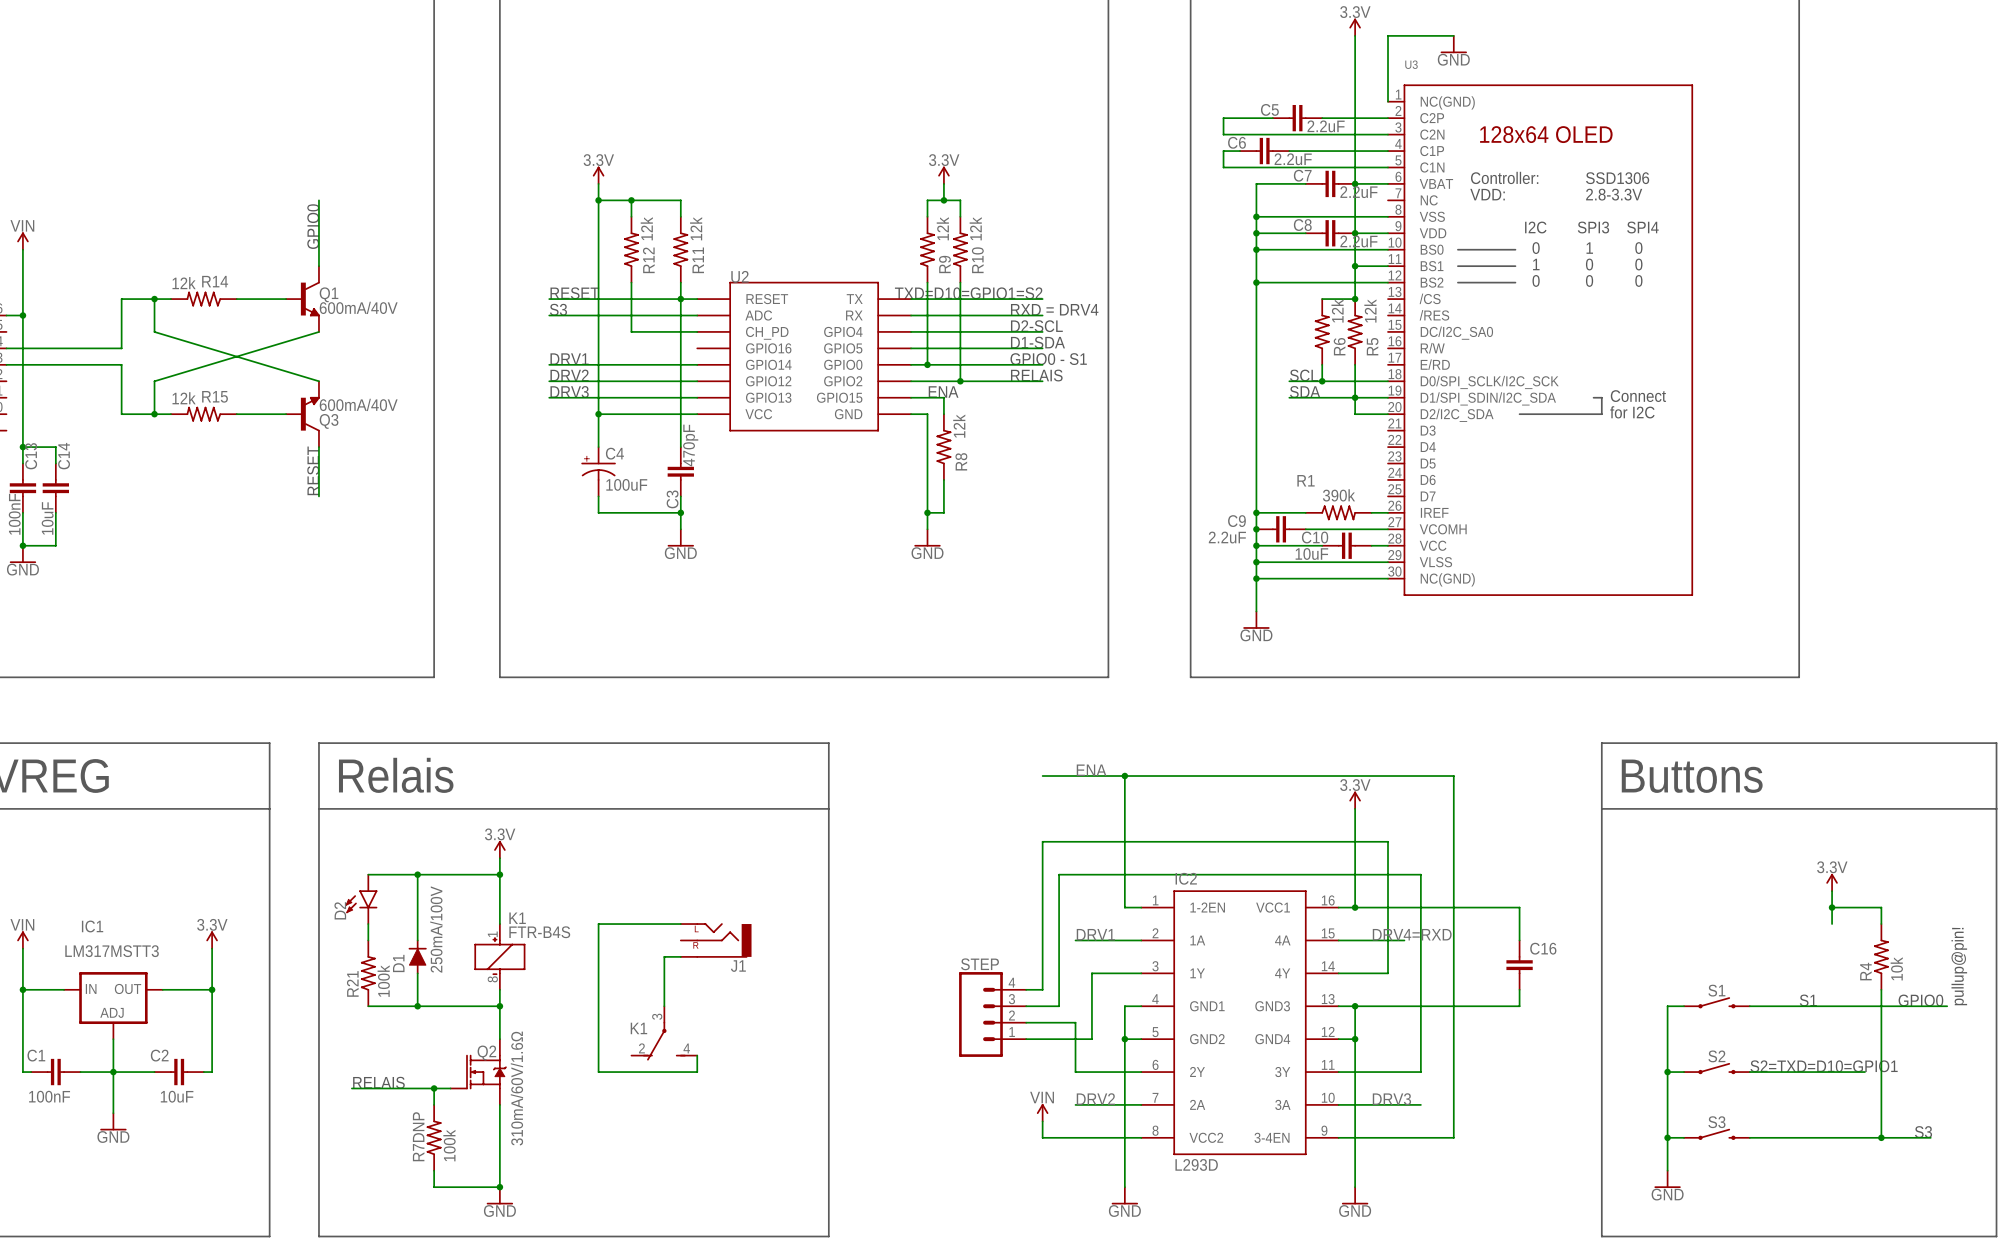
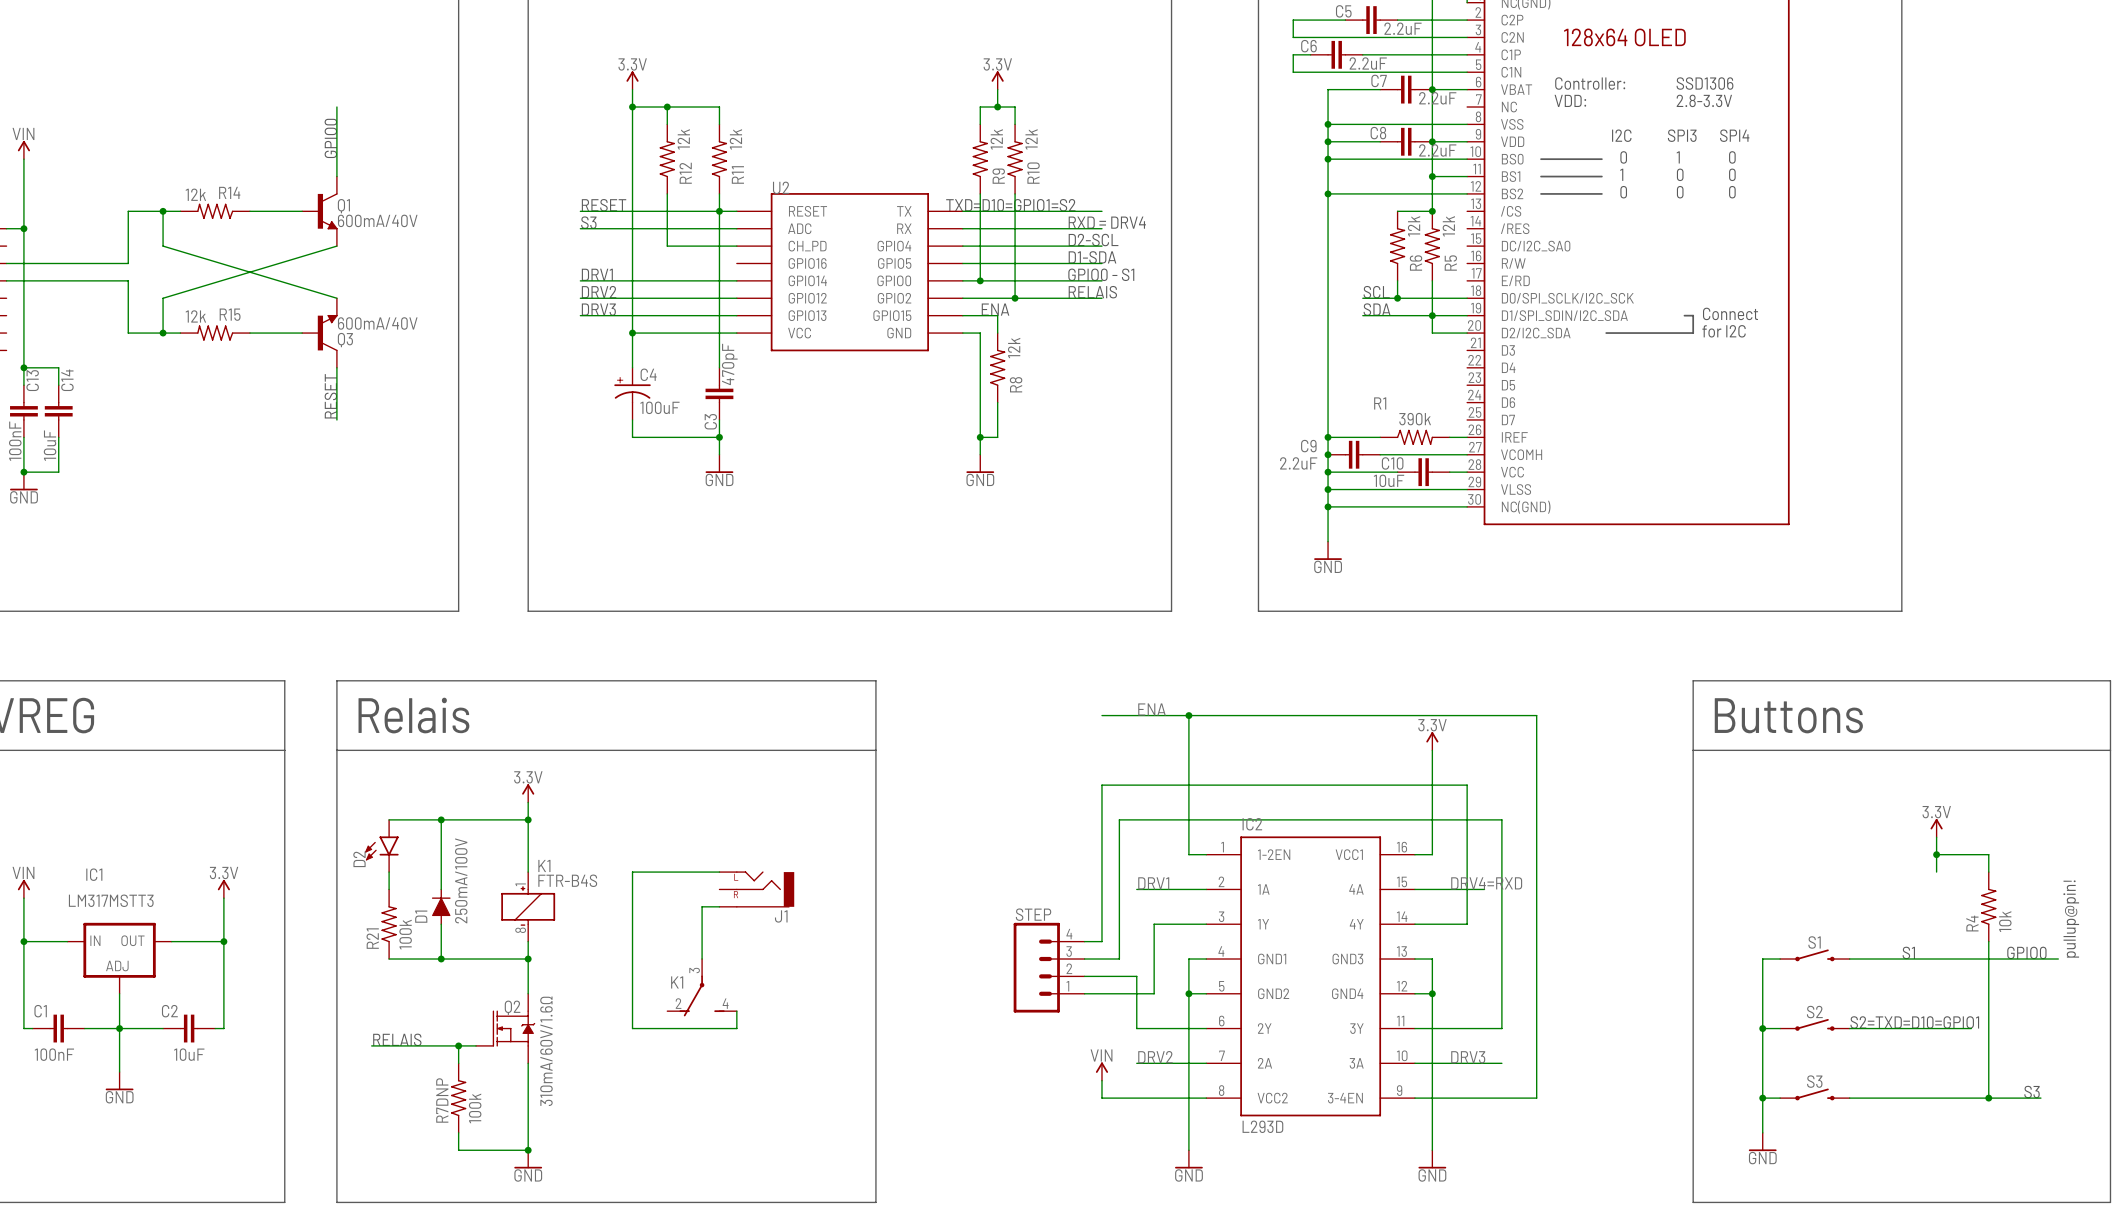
wire: (1355, 907) (1519, 907) (1519, 940) -> none
junction: (1355, 907) -> none
C16: (1519, 965) -> none
wire: (1519, 989) (1519, 1006) (1355, 1006) -> none
junction: (1355, 1006) -> none

